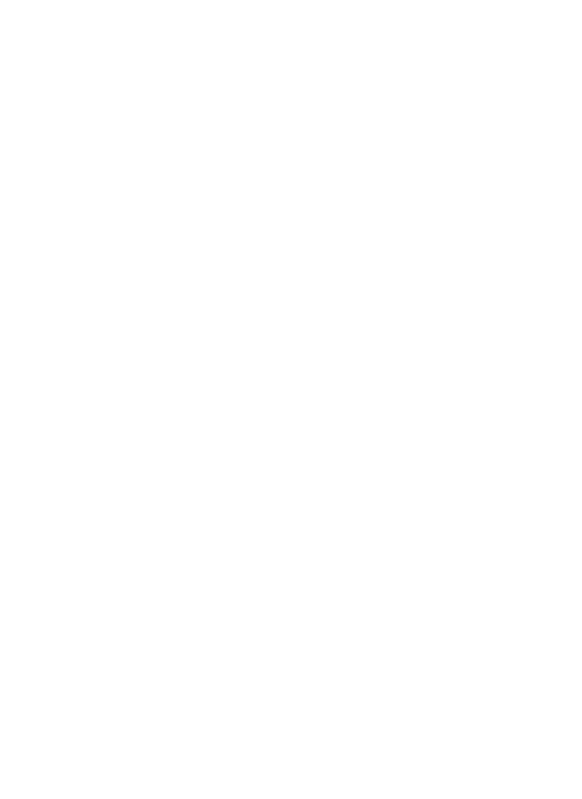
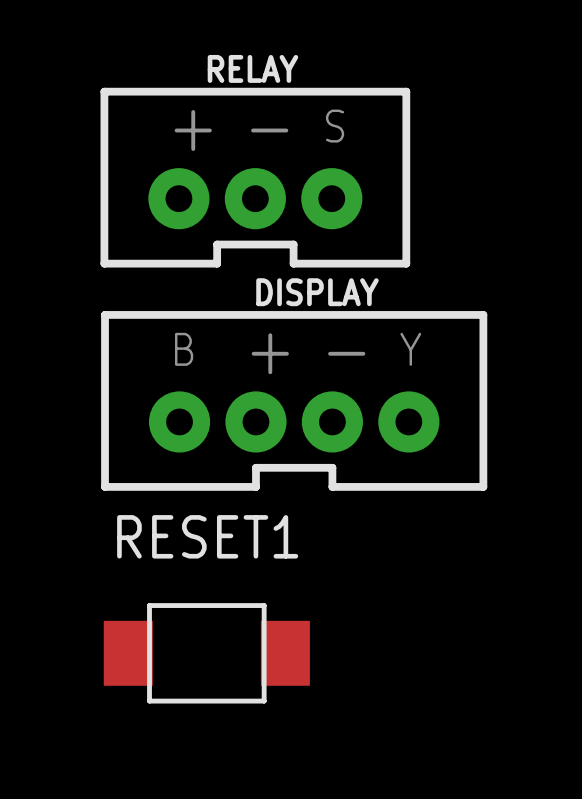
RELAY: none -> (255, 177)
DISPLAY: none -> (294, 400)
RESET1: none -> (206, 653)

